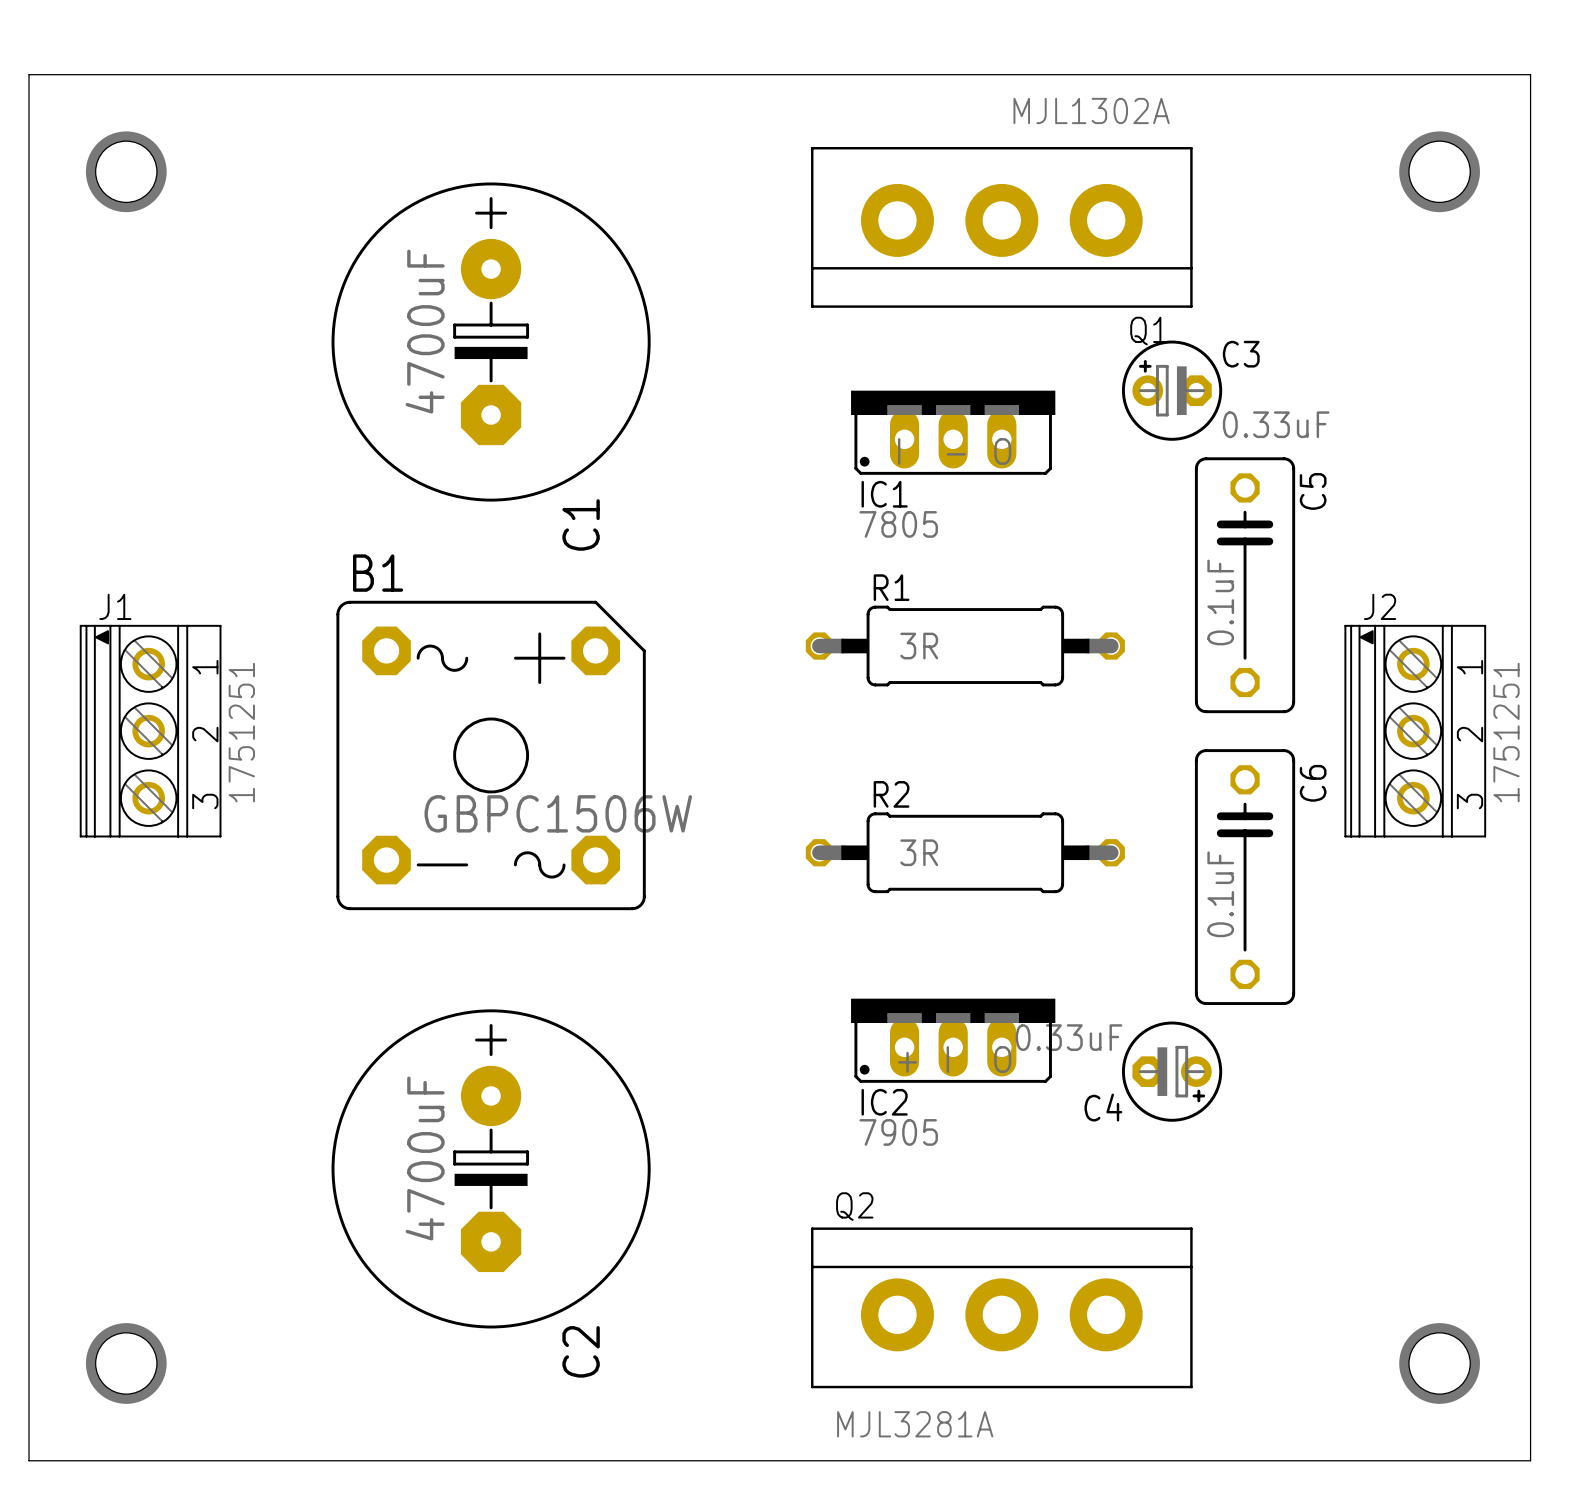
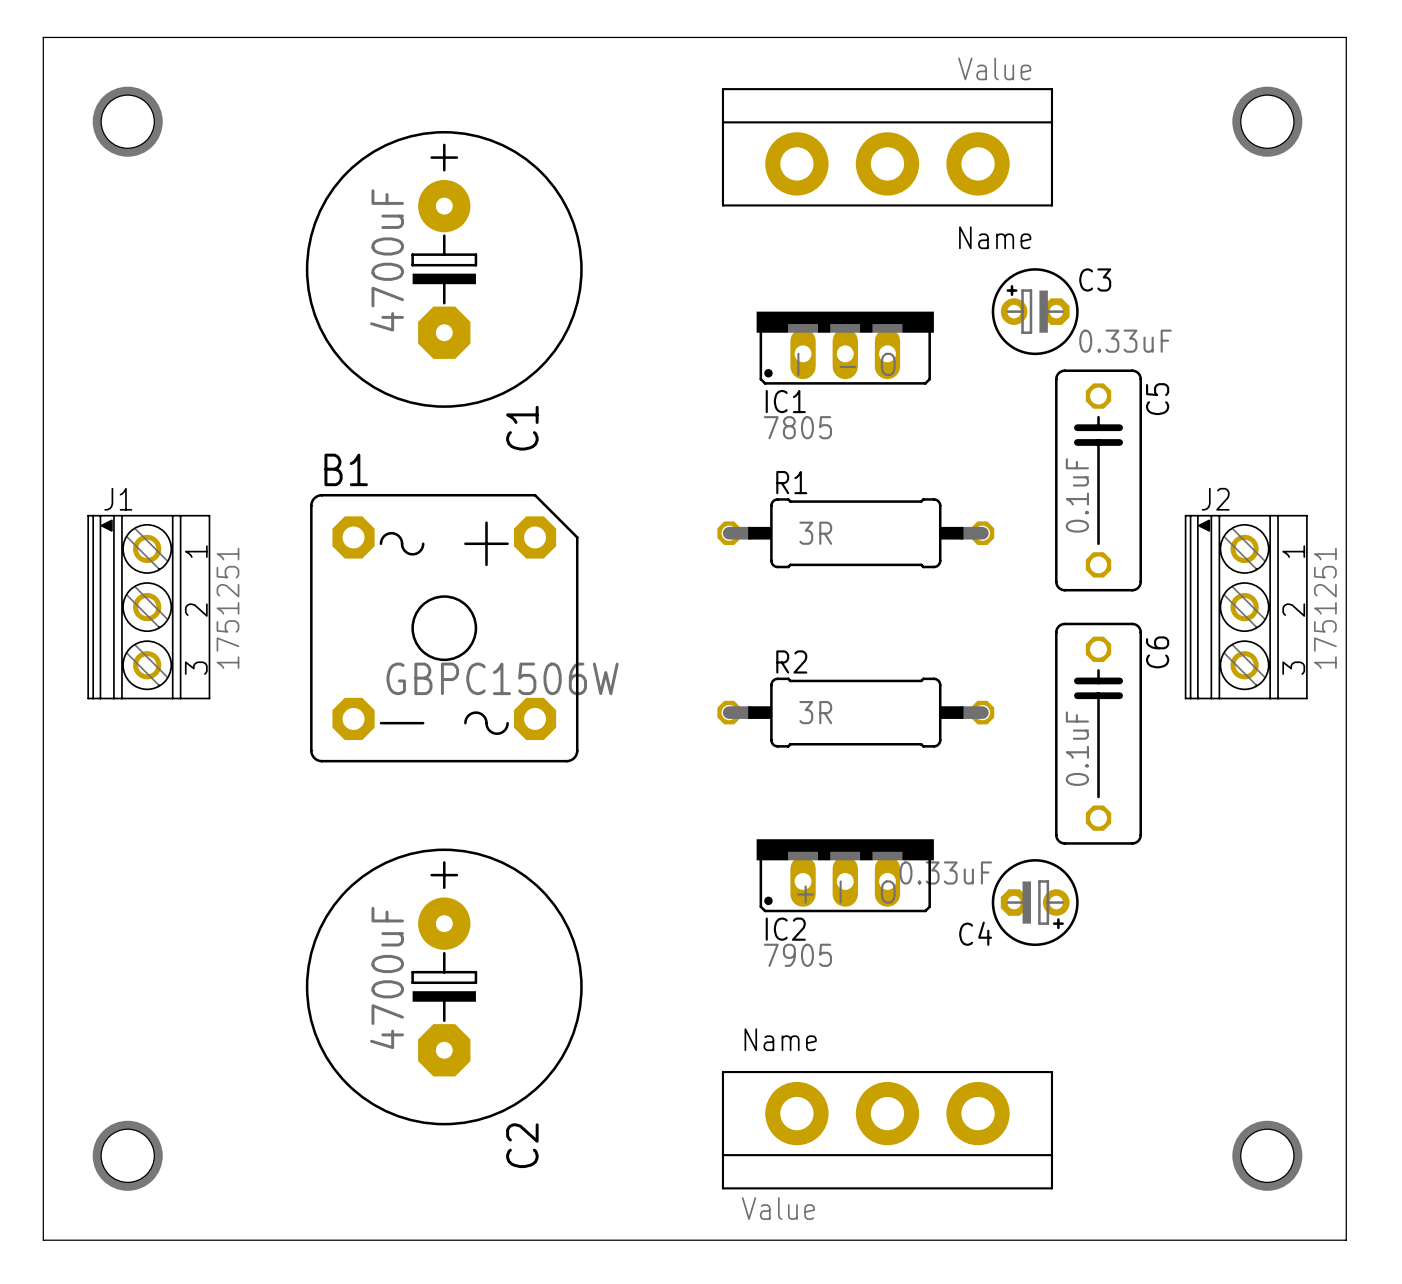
part: none -> (887, 147)
Q1: MJL1302A (1001, 227) -> none
Q2: MJL3281A (1001, 1307) -> none
part: none -> (887, 1130)

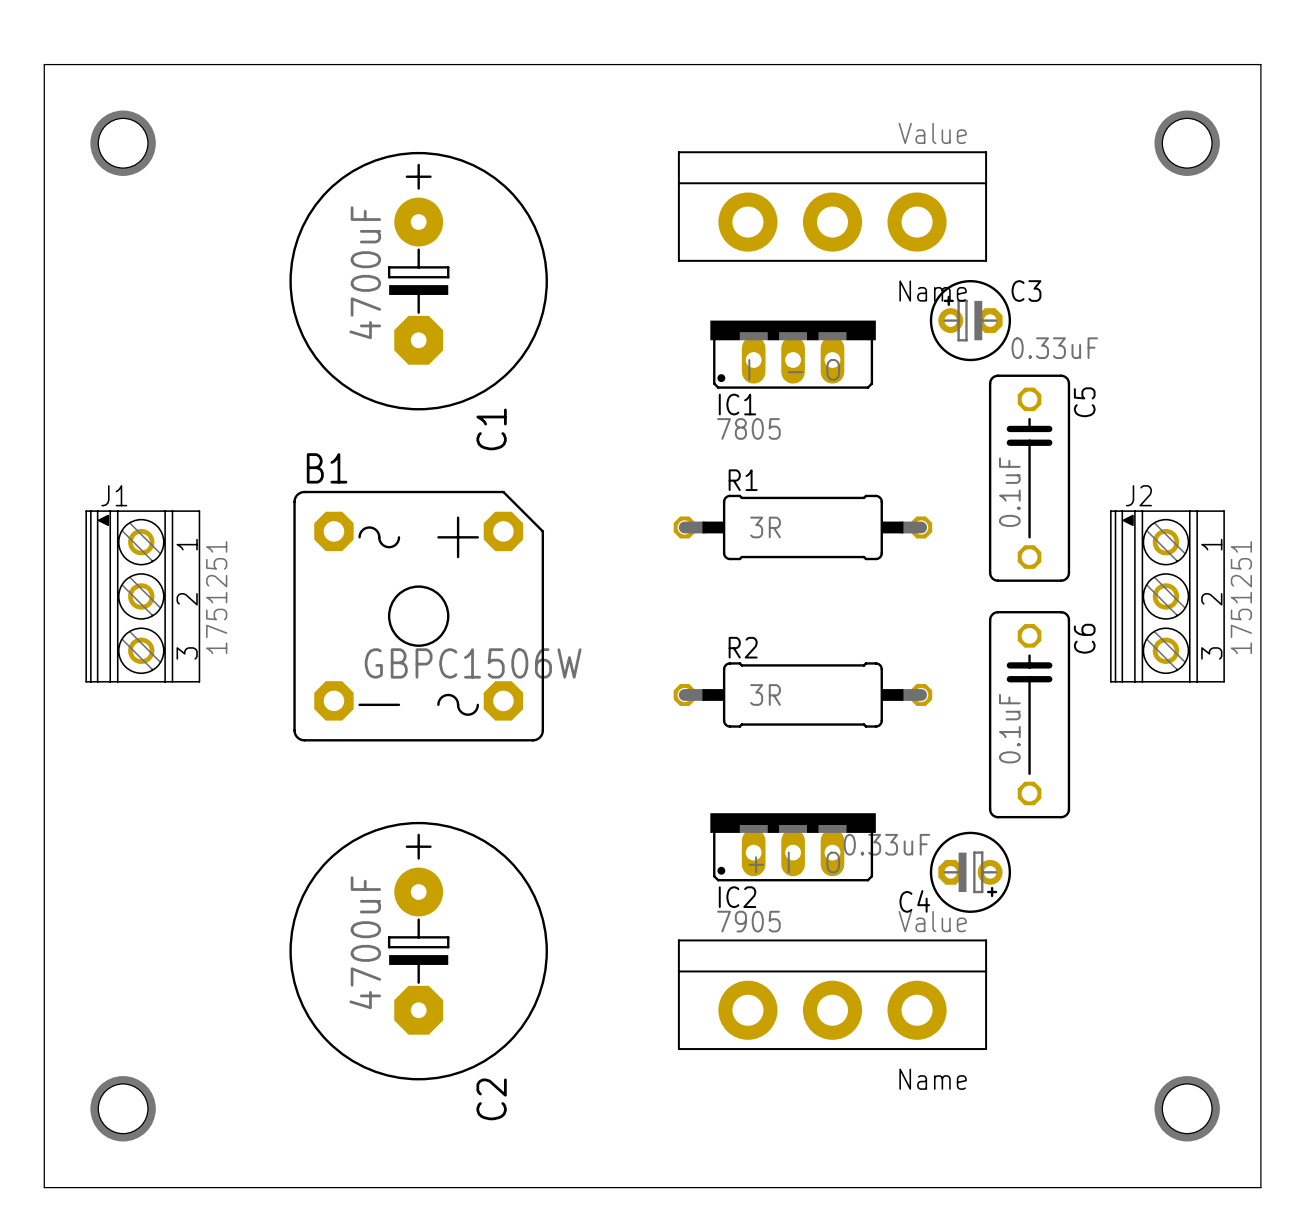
part position: (887, 147) -> (832, 206)
part: none -> (832, 994)
part: (887, 1130) -> none

